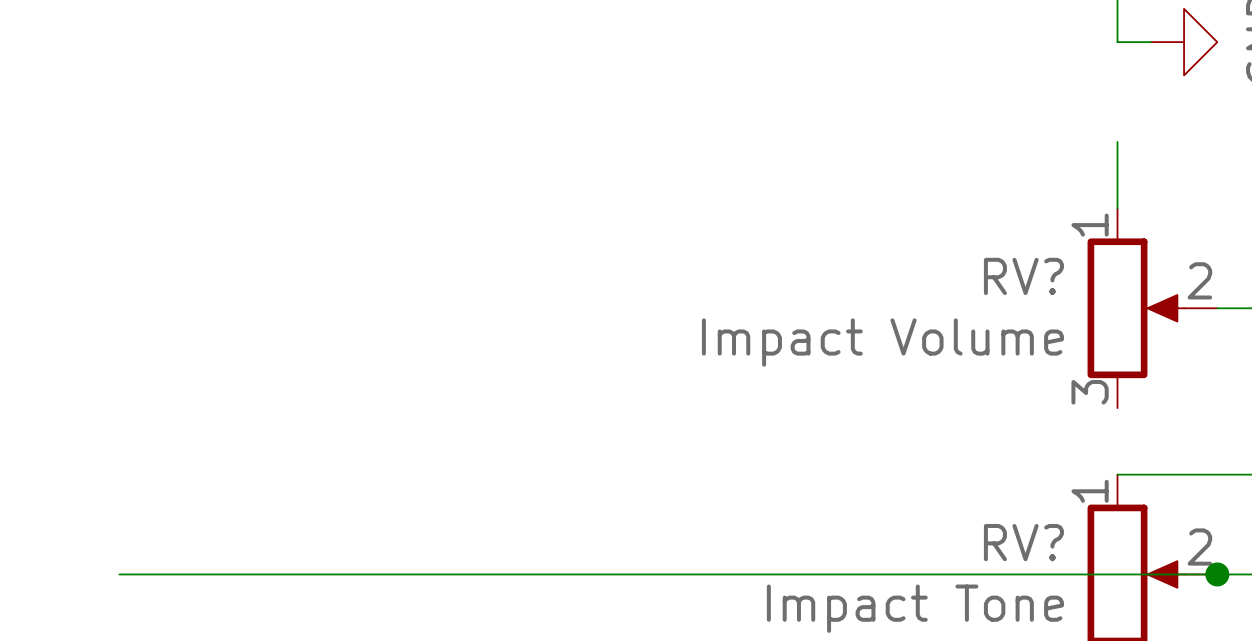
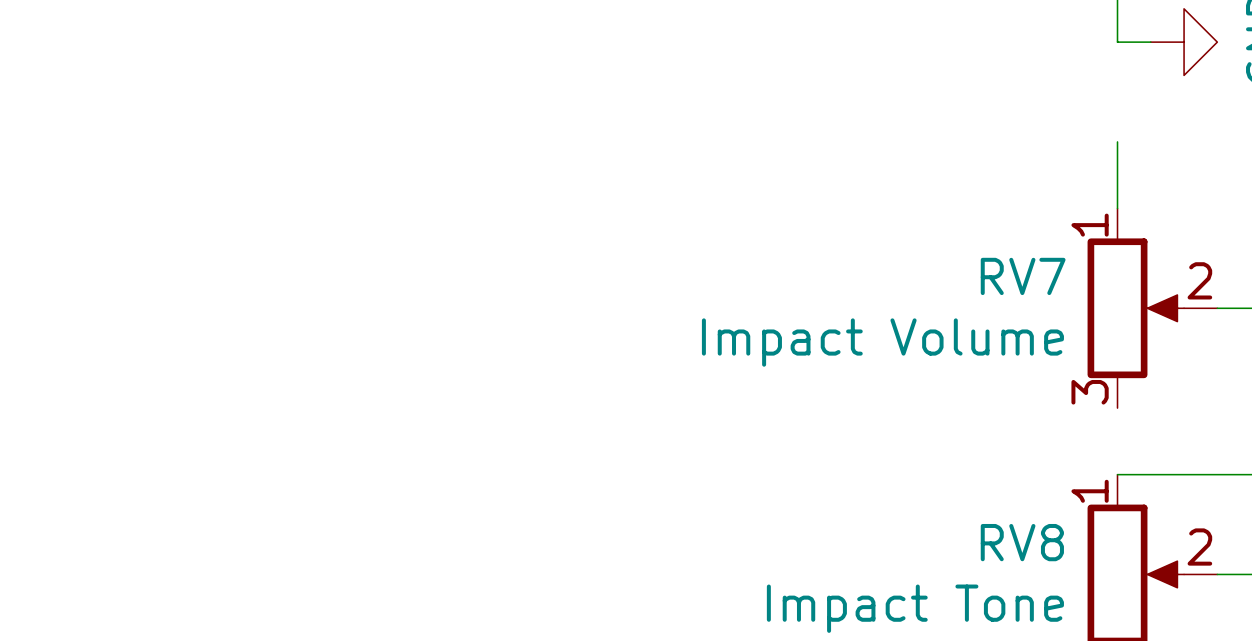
RV? name: RV? (1023, 276) -> RV7 (1023, 276)
RV? name: RV? (1023, 542) -> RV8 (1022, 542)
wire: (119, 574) (1217, 574) -> none
junction: (1217, 574) -> none

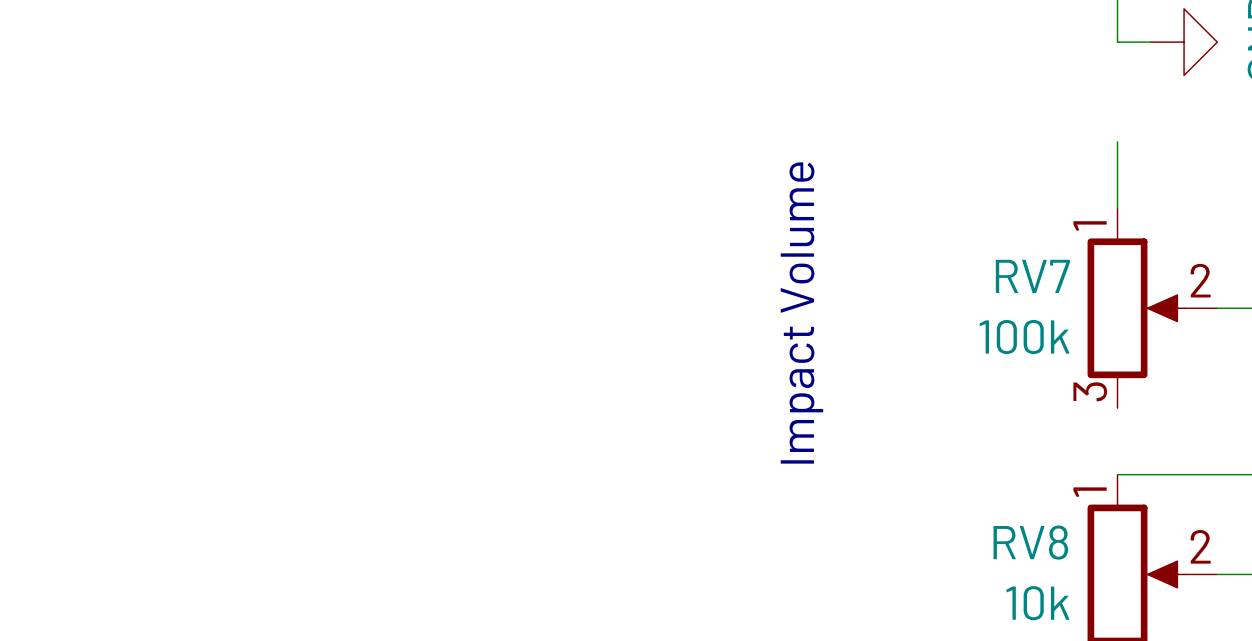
text: none -> Impact Volume (801, 313)
RV7 value: Impact Volume (882, 342) -> 100k (1024, 337)
RV8 value: Impact Tone (915, 608) -> 10k (1037, 603)

